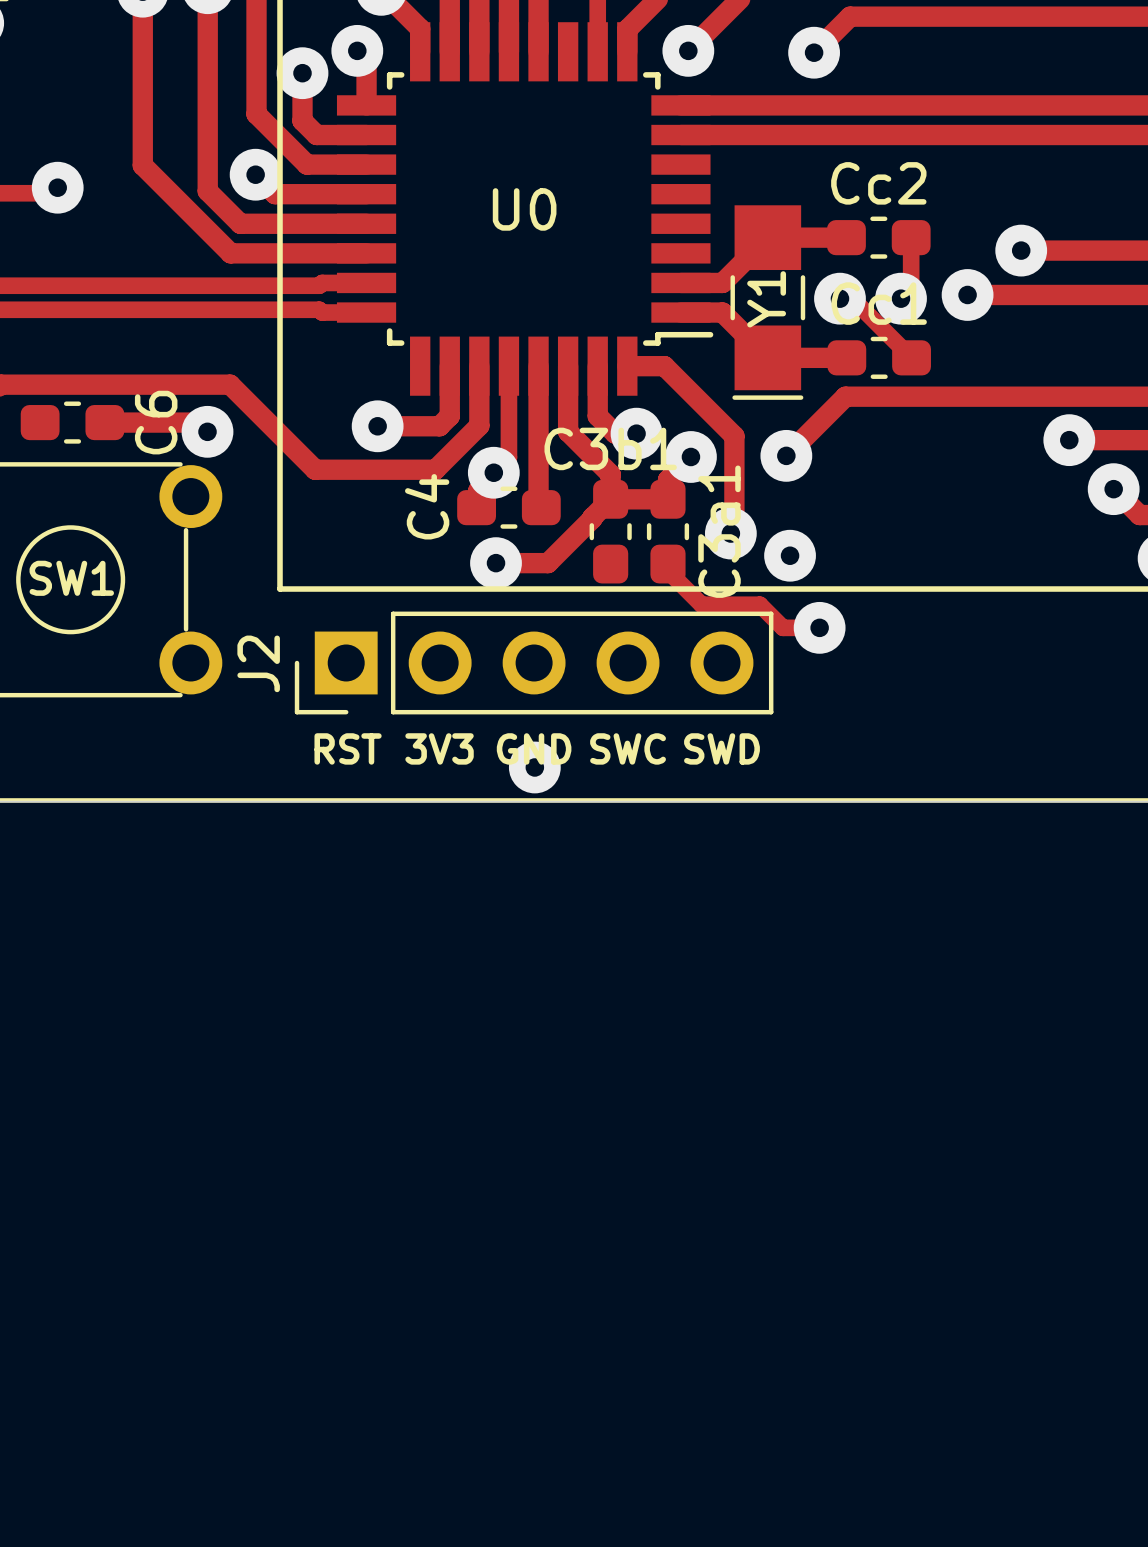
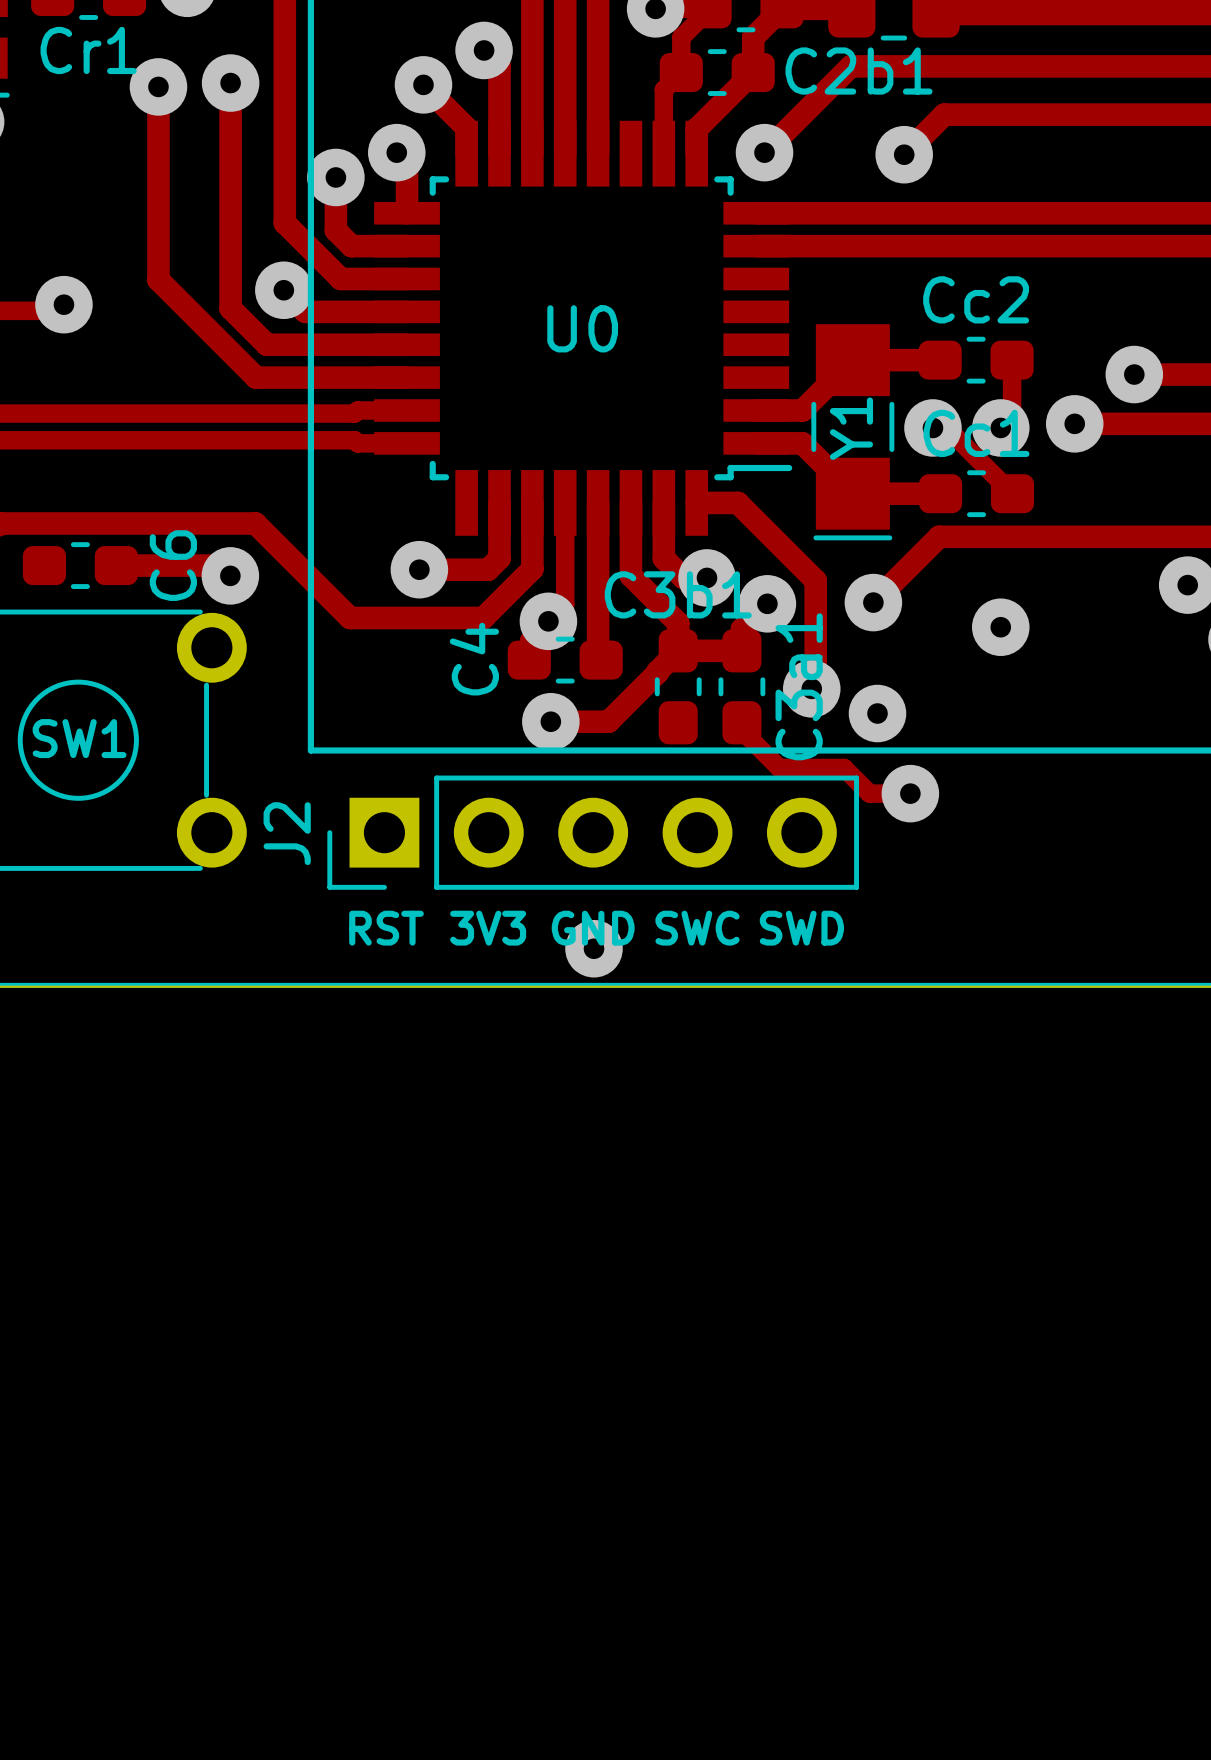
via: none -> (1000, 627)

